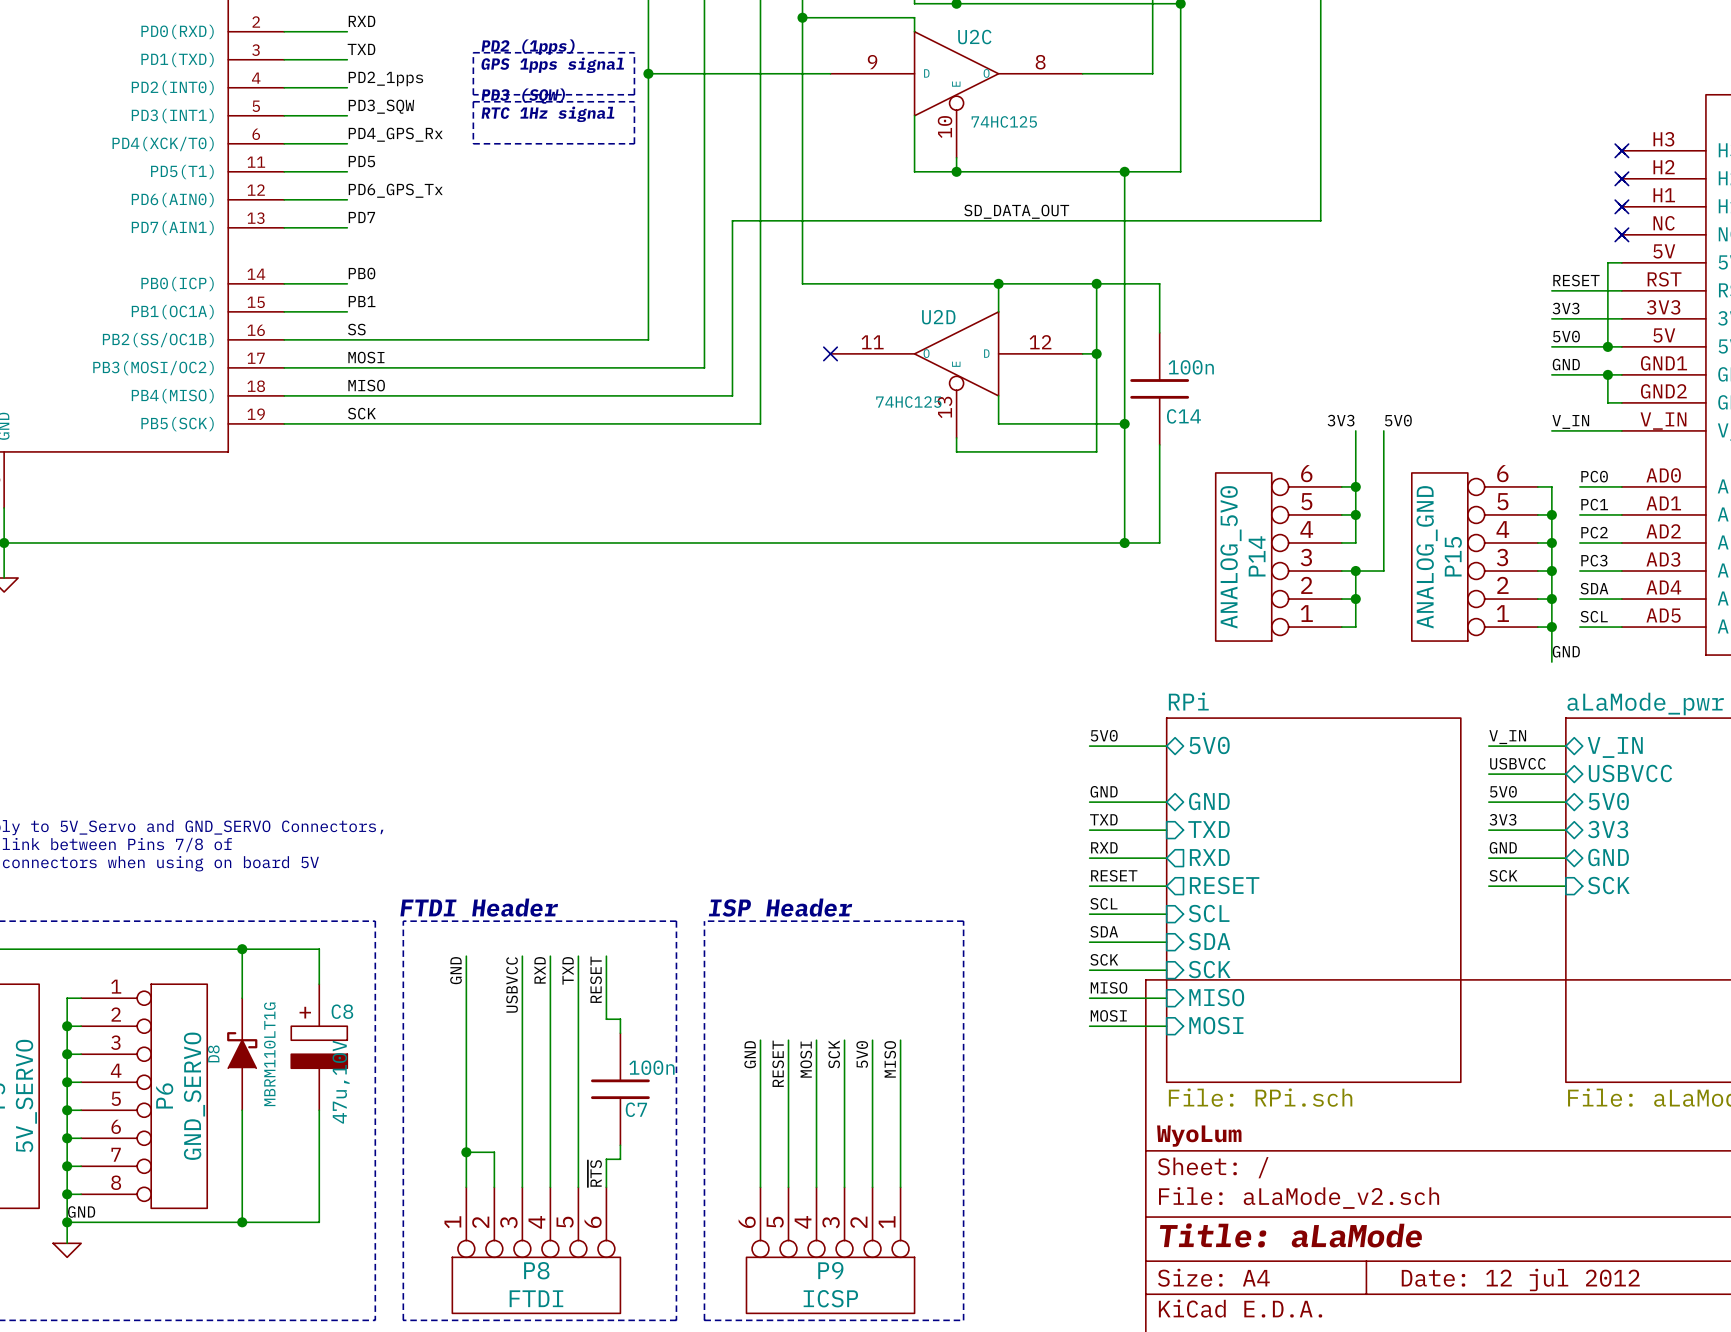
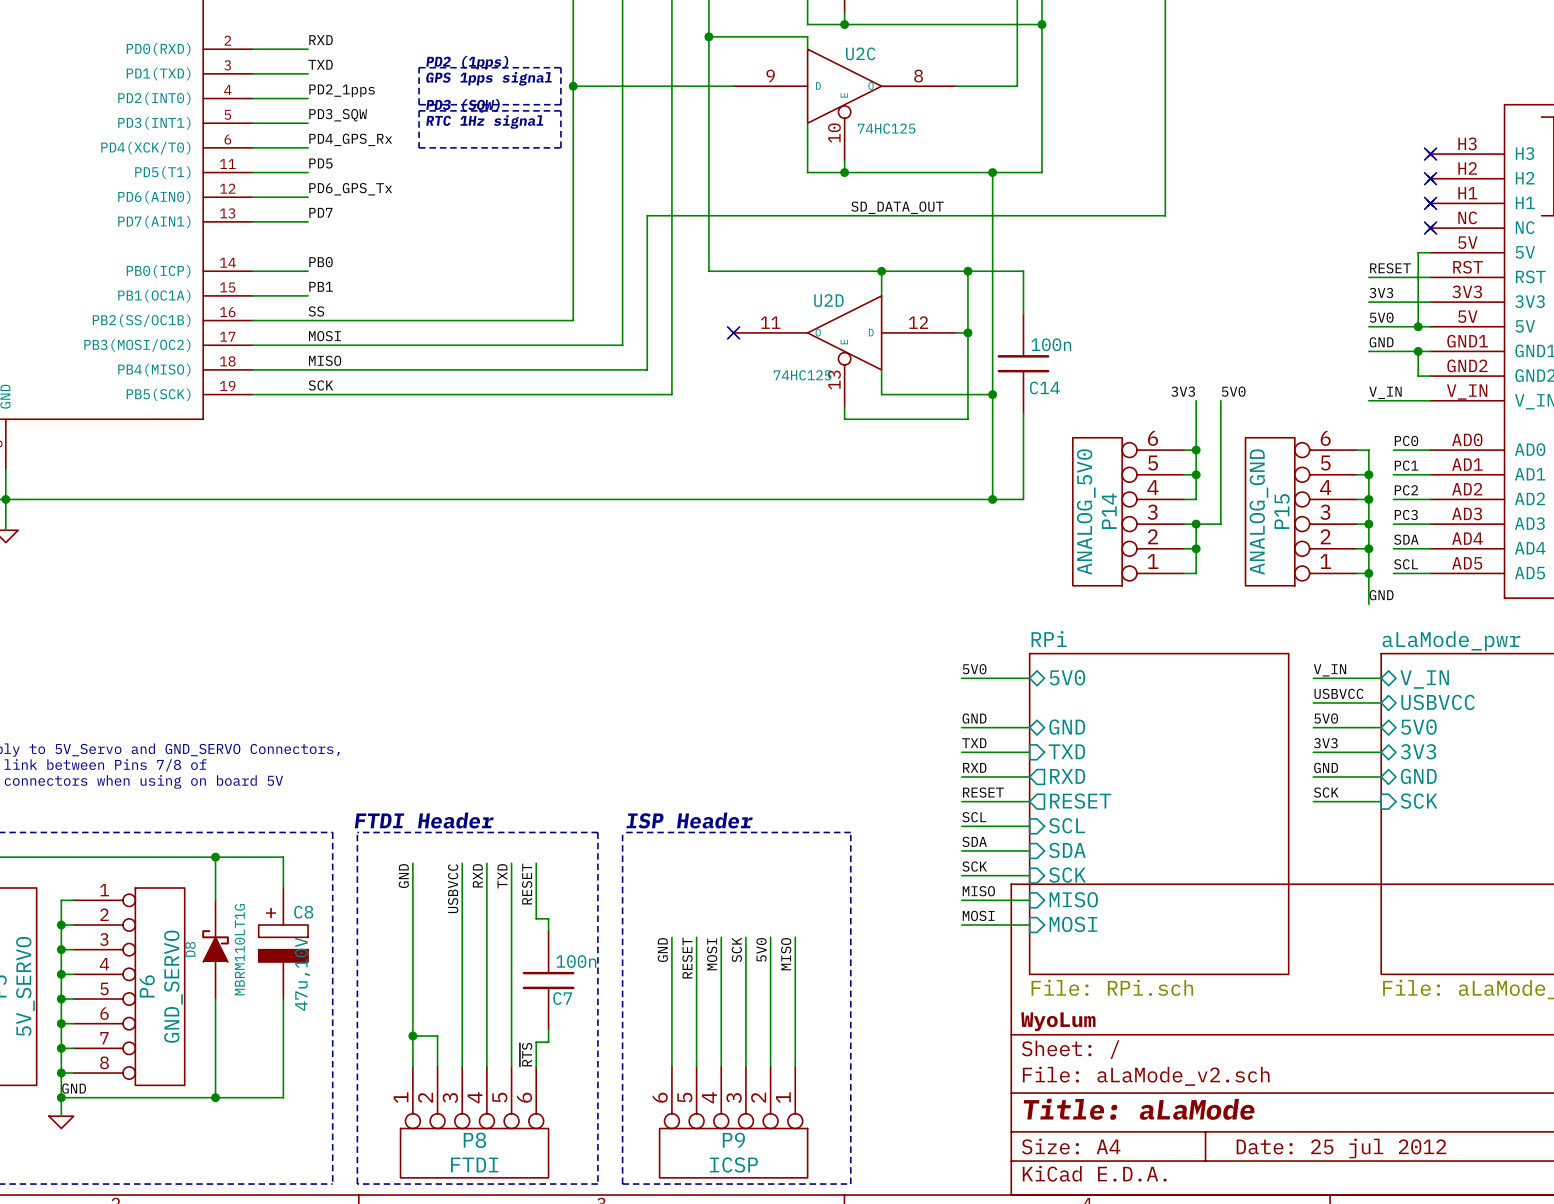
title block: Date: 12 jul 2012 (1520, 1279) -> Date: 25 jul 2012 (1341, 1148)

